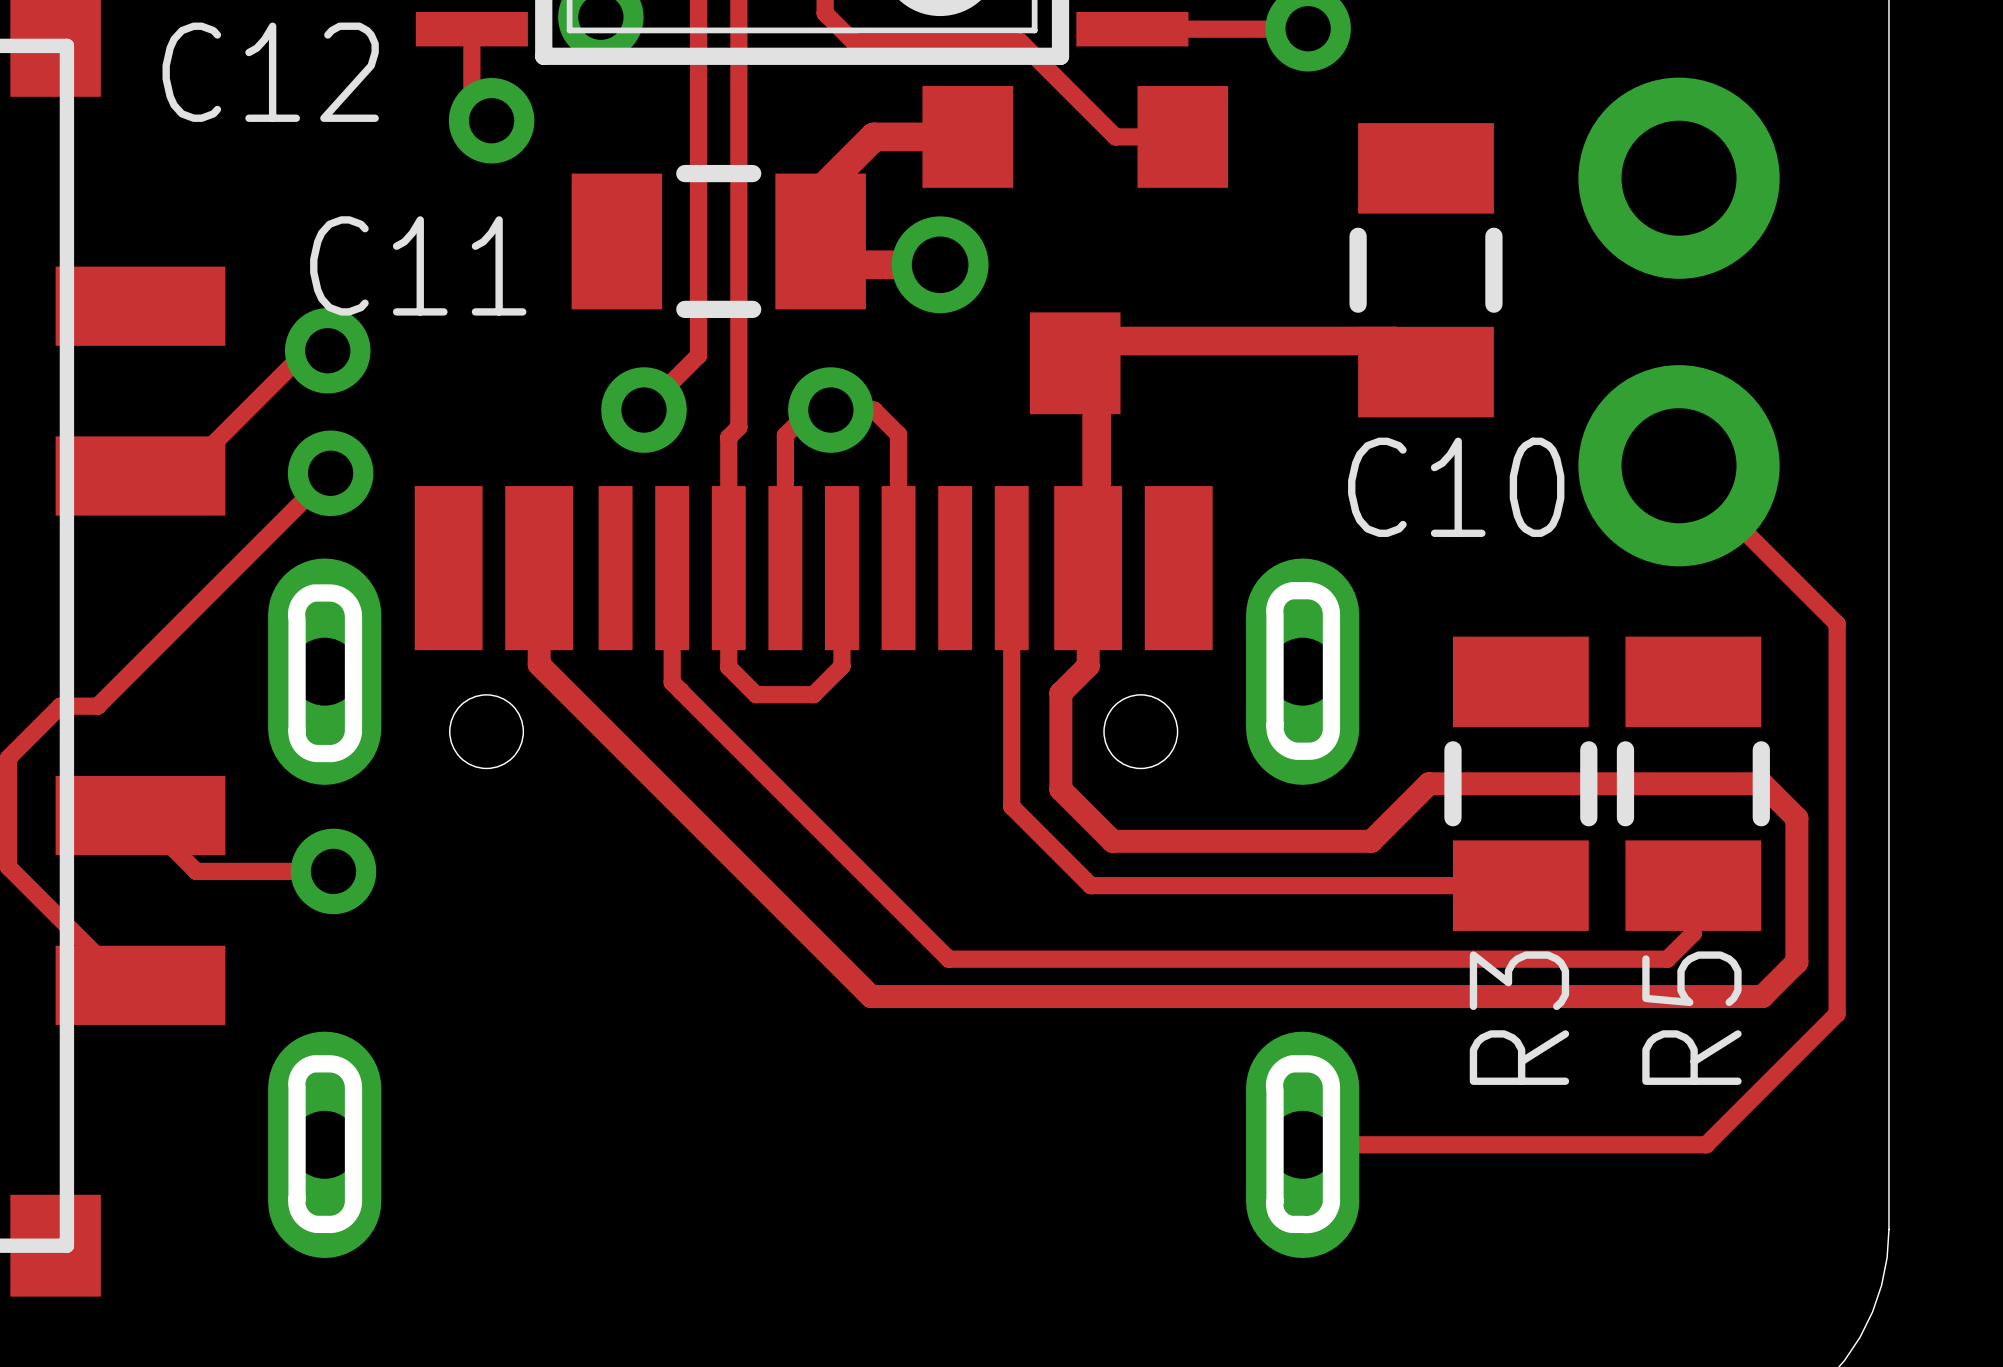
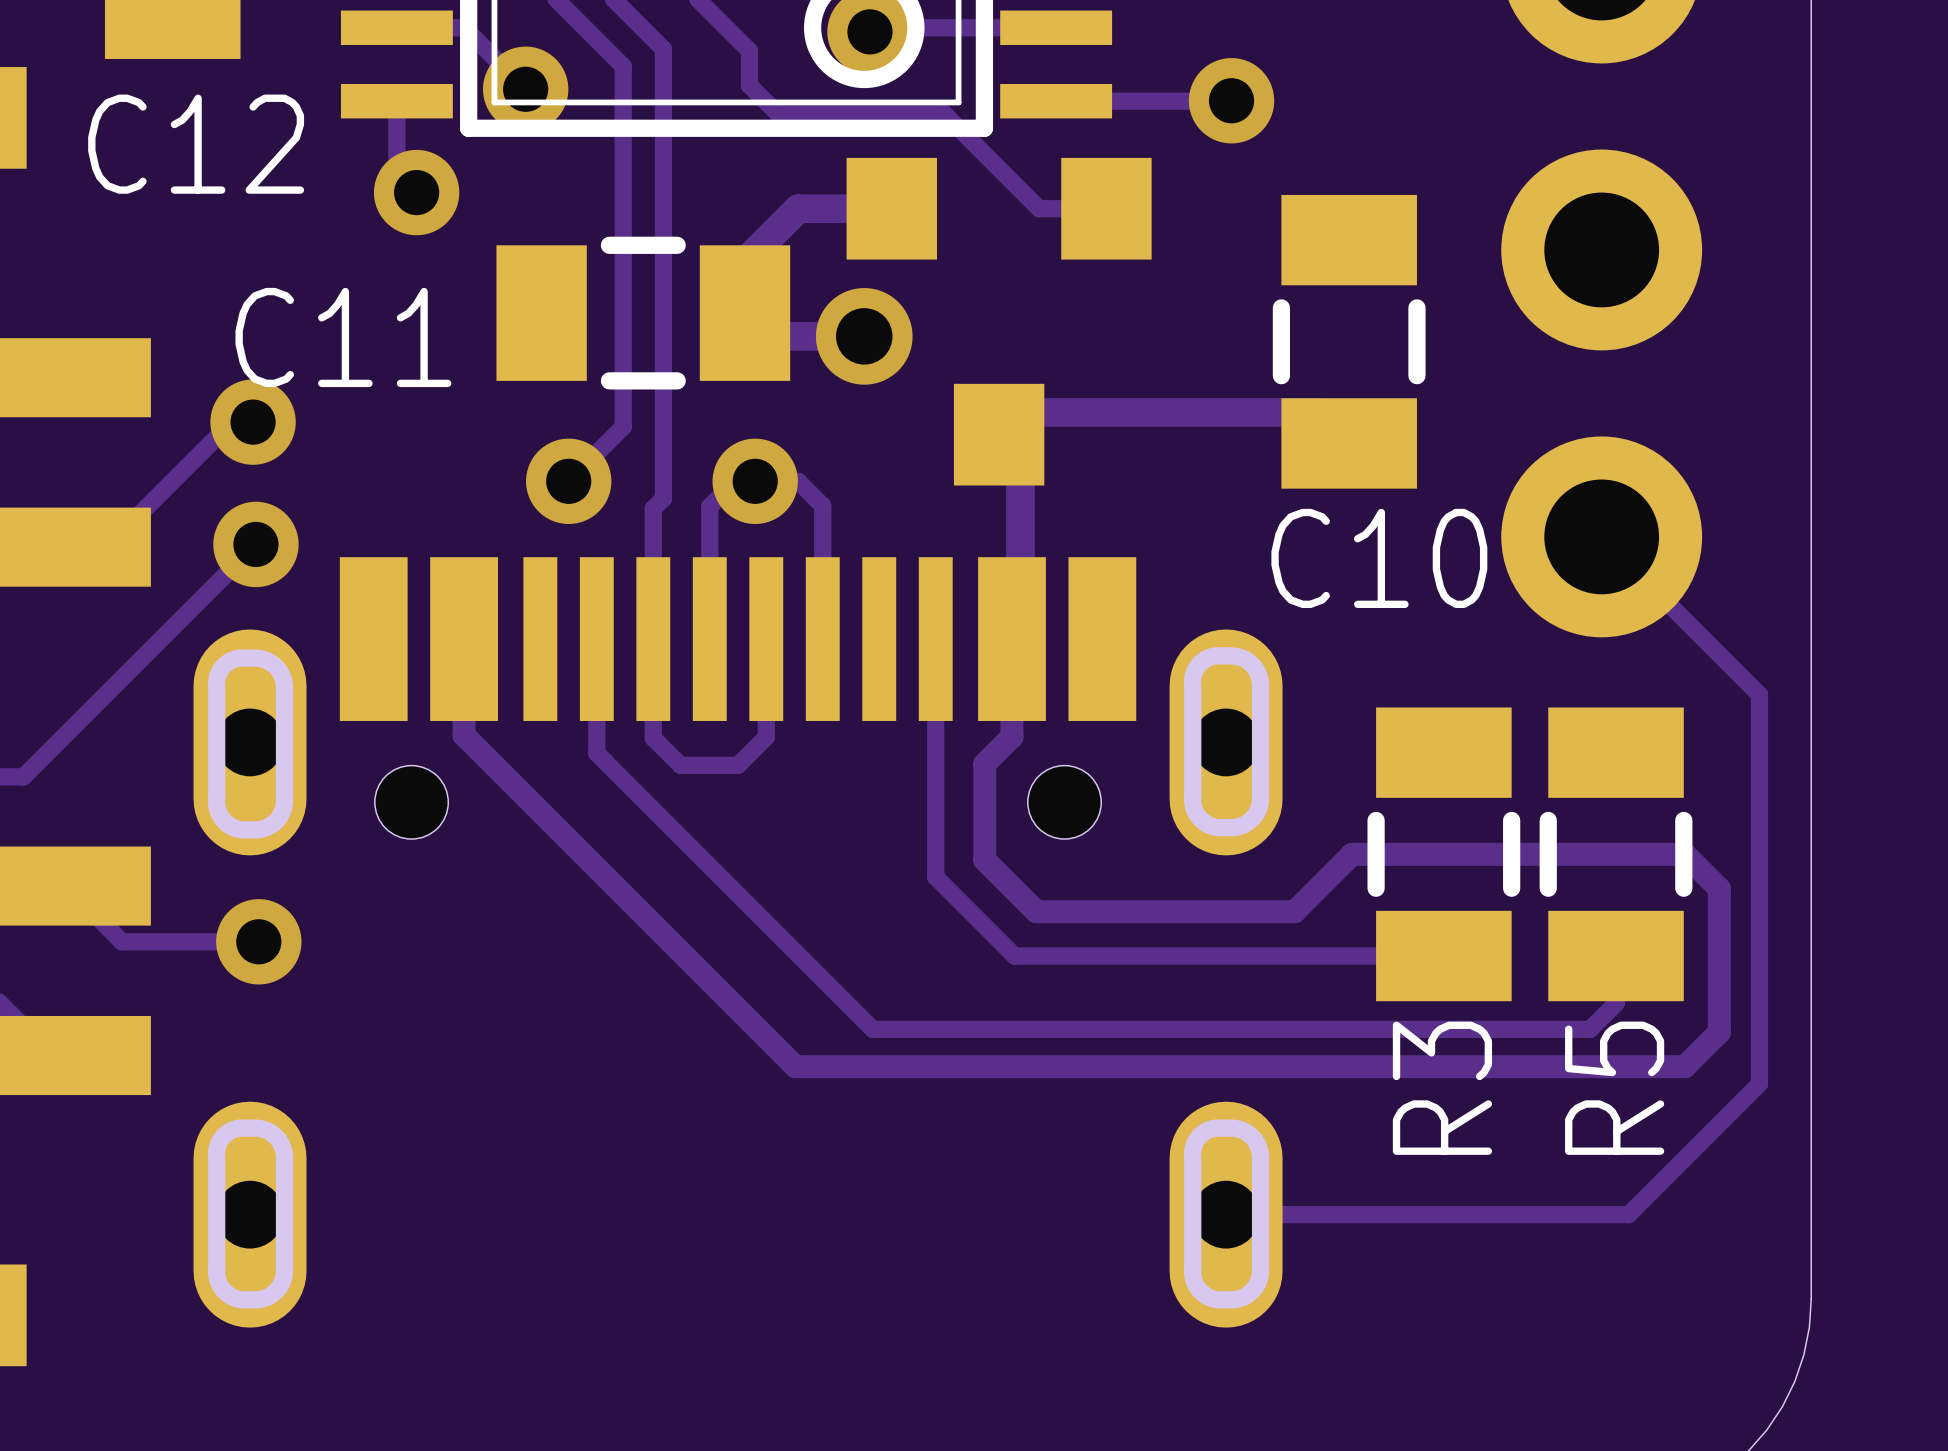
part footprint: [268, 486, 1360, 1259] -> [193, 557, 1283, 1328]

